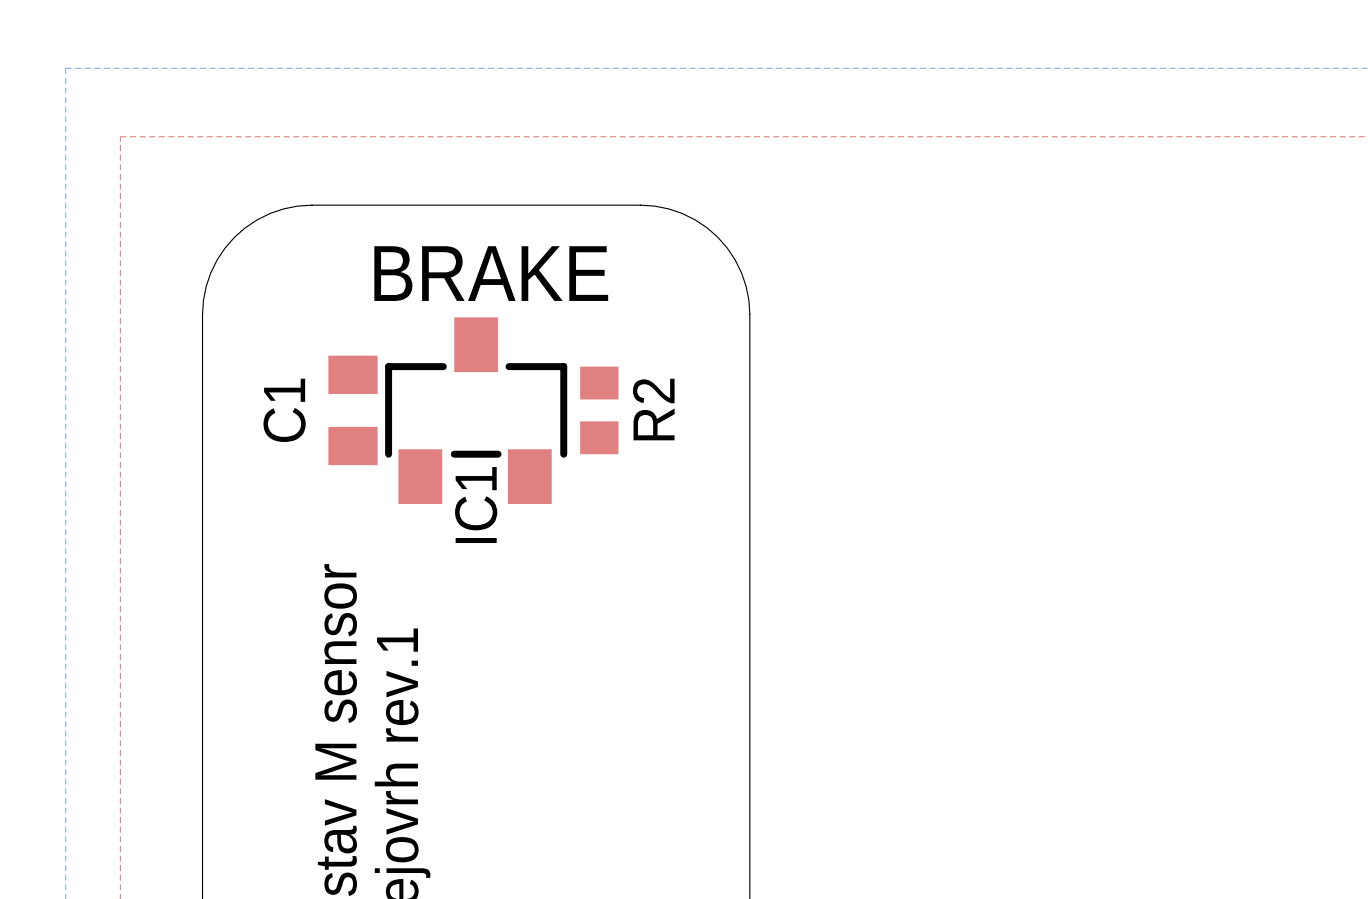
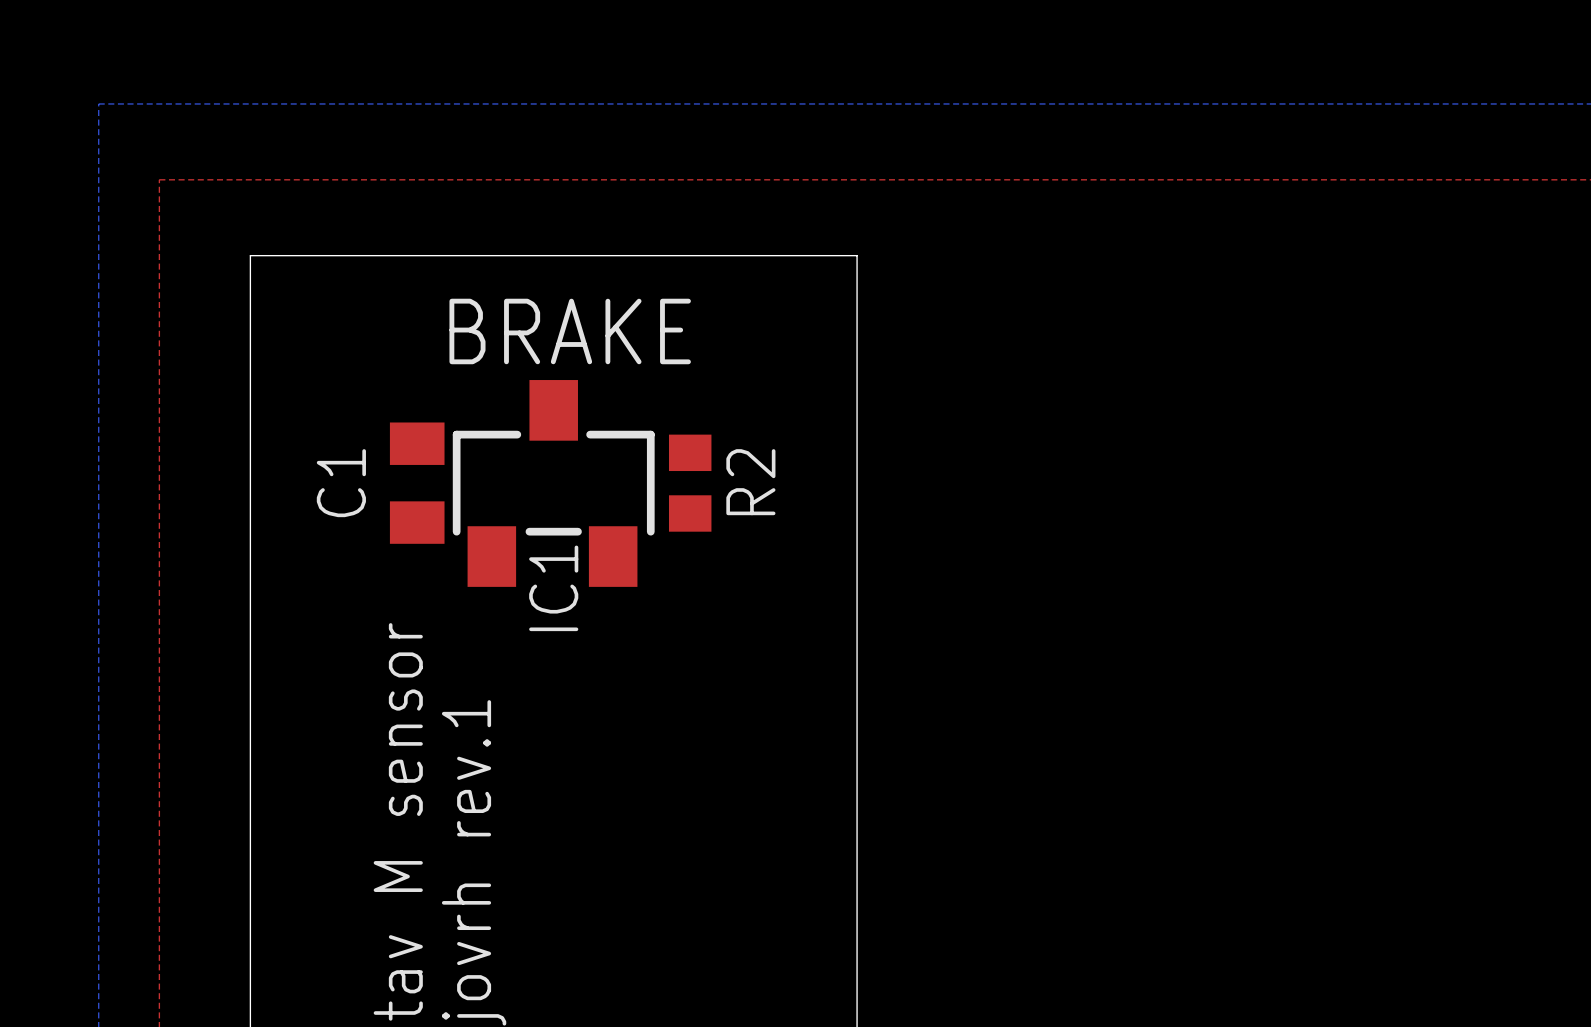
board edge: (311, 205) (283, 208) (270, 213) (257, 219) (234, 237) (217, 259) (210, 272) (206, 286) (202, 314) -> (371, 255) (250, 255) (250, 376)
board edge: (640, 205) (668, 208) (682, 213) (695, 219) (717, 237) (735, 259) (741, 272) (746, 286) (749, 314) -> (735, 255) (857, 255) (857, 376)

